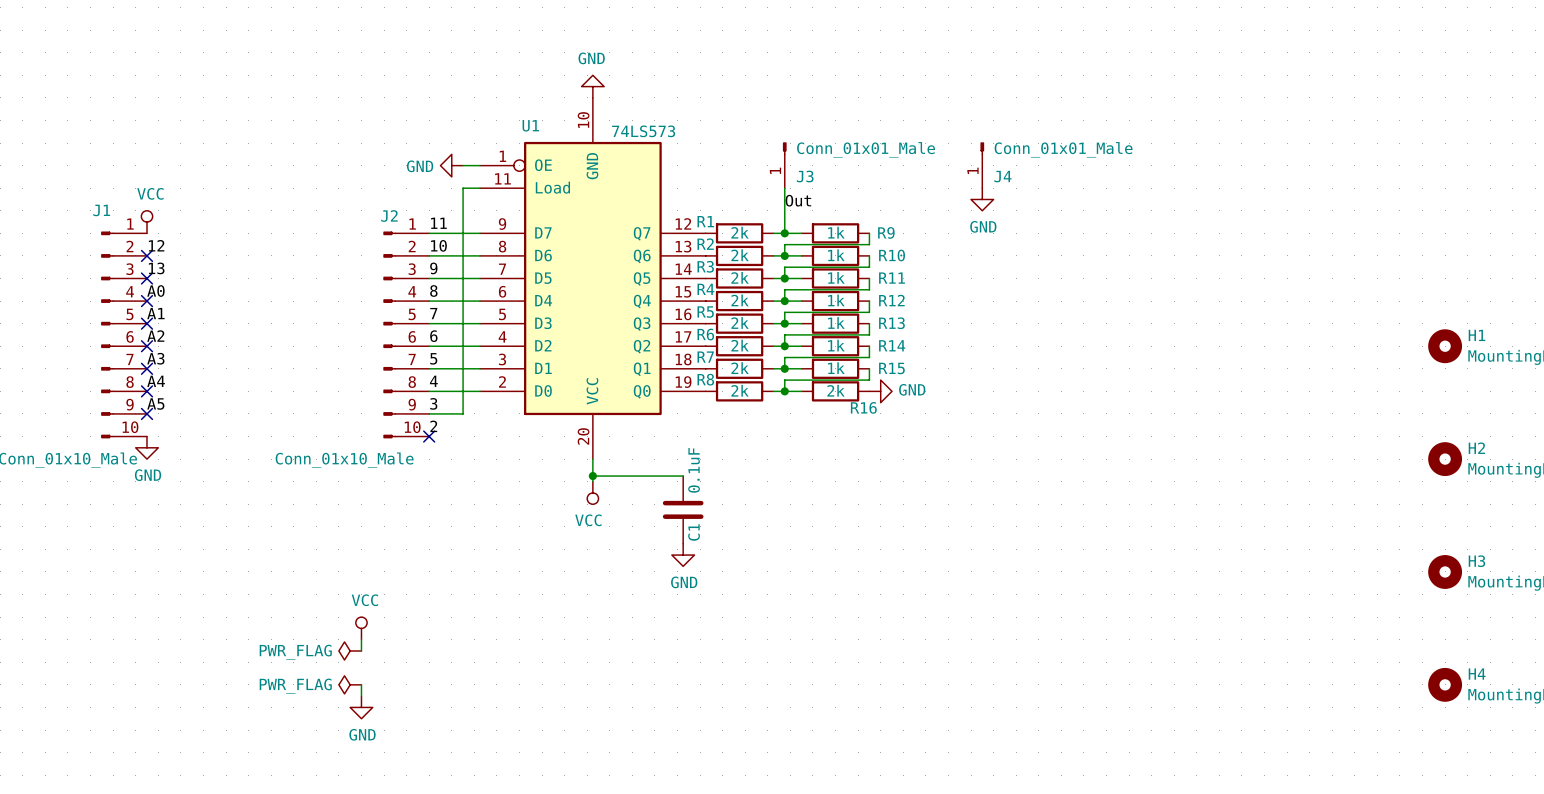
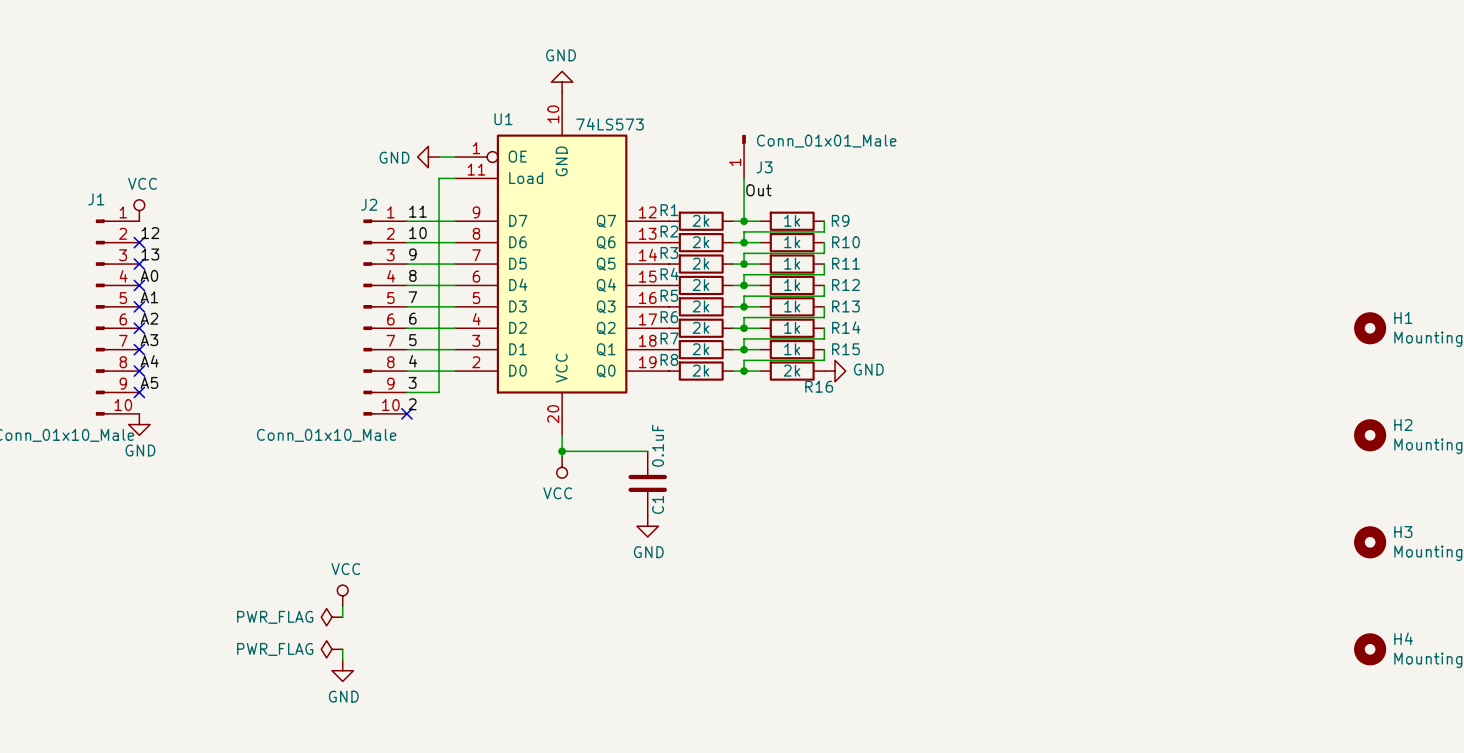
J4: Conn_01x01_Male (982, 165) -> none
power symbol: GND (982, 199) -> none

